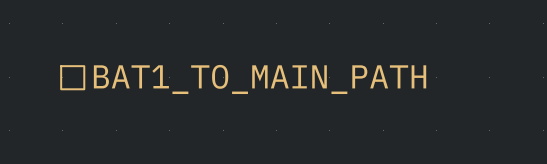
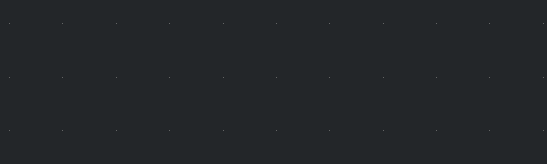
hierarchical label: BAT1_TO_MAIN_PATH (260, 79) -> none

